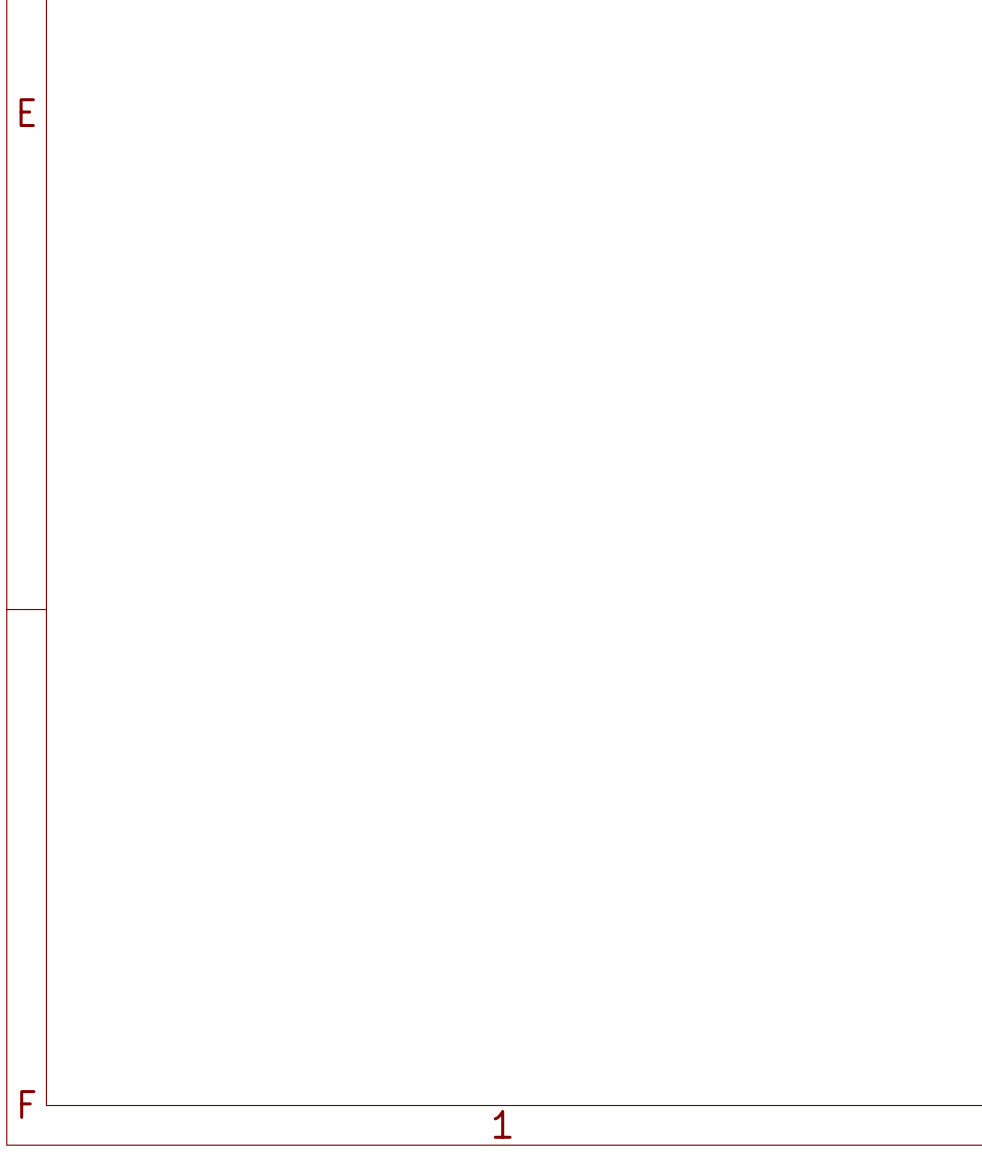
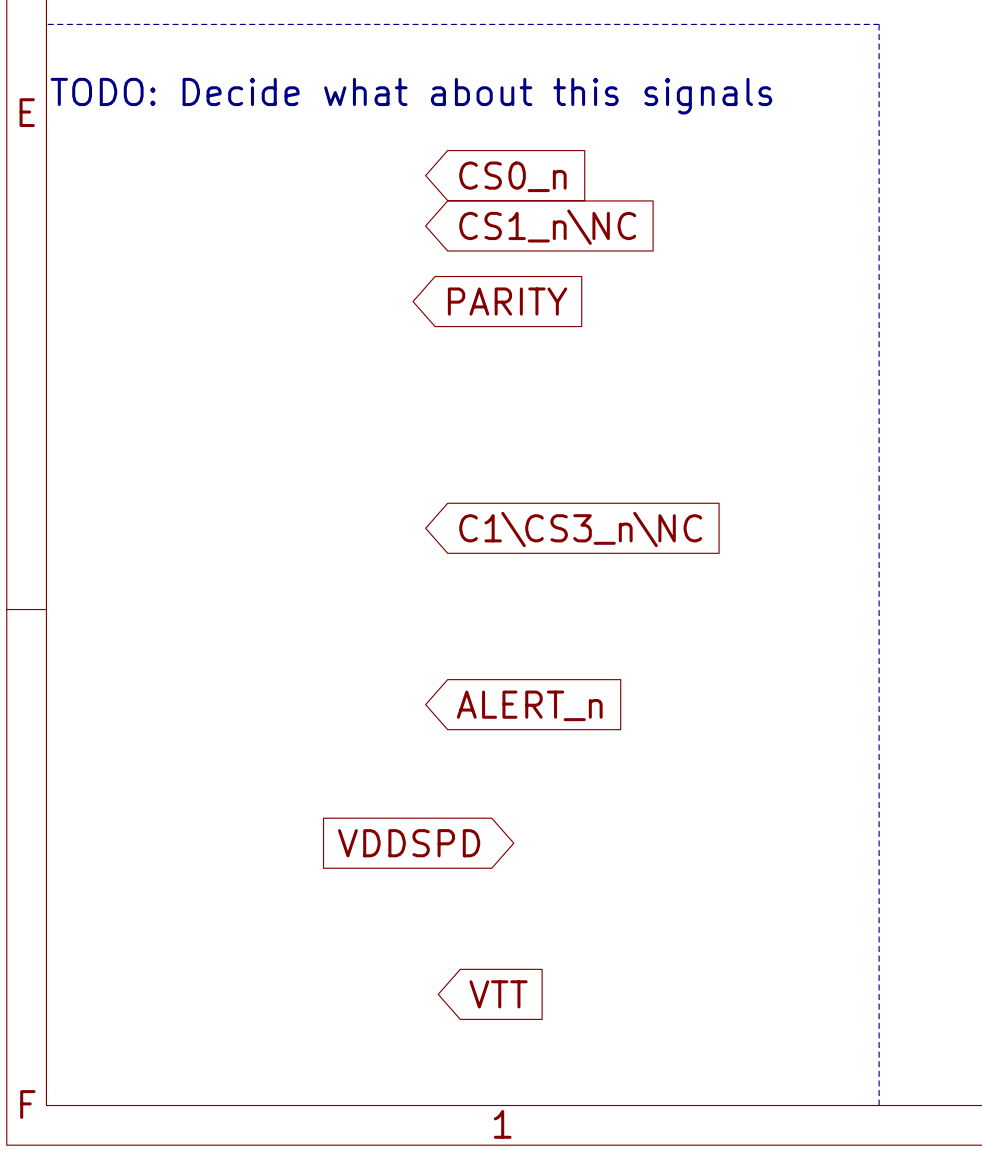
line: none -> (47, 24) (879, 24) (879, 1107)
text: none -> TODO: Decide what about this signals (411, 96)
global label: none -> CS0_n (512, 176)
global label: none -> CS1_n\NC (547, 227)
global label: none -> PARITY (507, 301)
global label: none -> C1\CS3_n\NC (580, 529)
global label: none -> ALERT_n (529, 705)
global label: none -> VDDSPD (409, 843)
global label: none -> VTT (498, 994)

